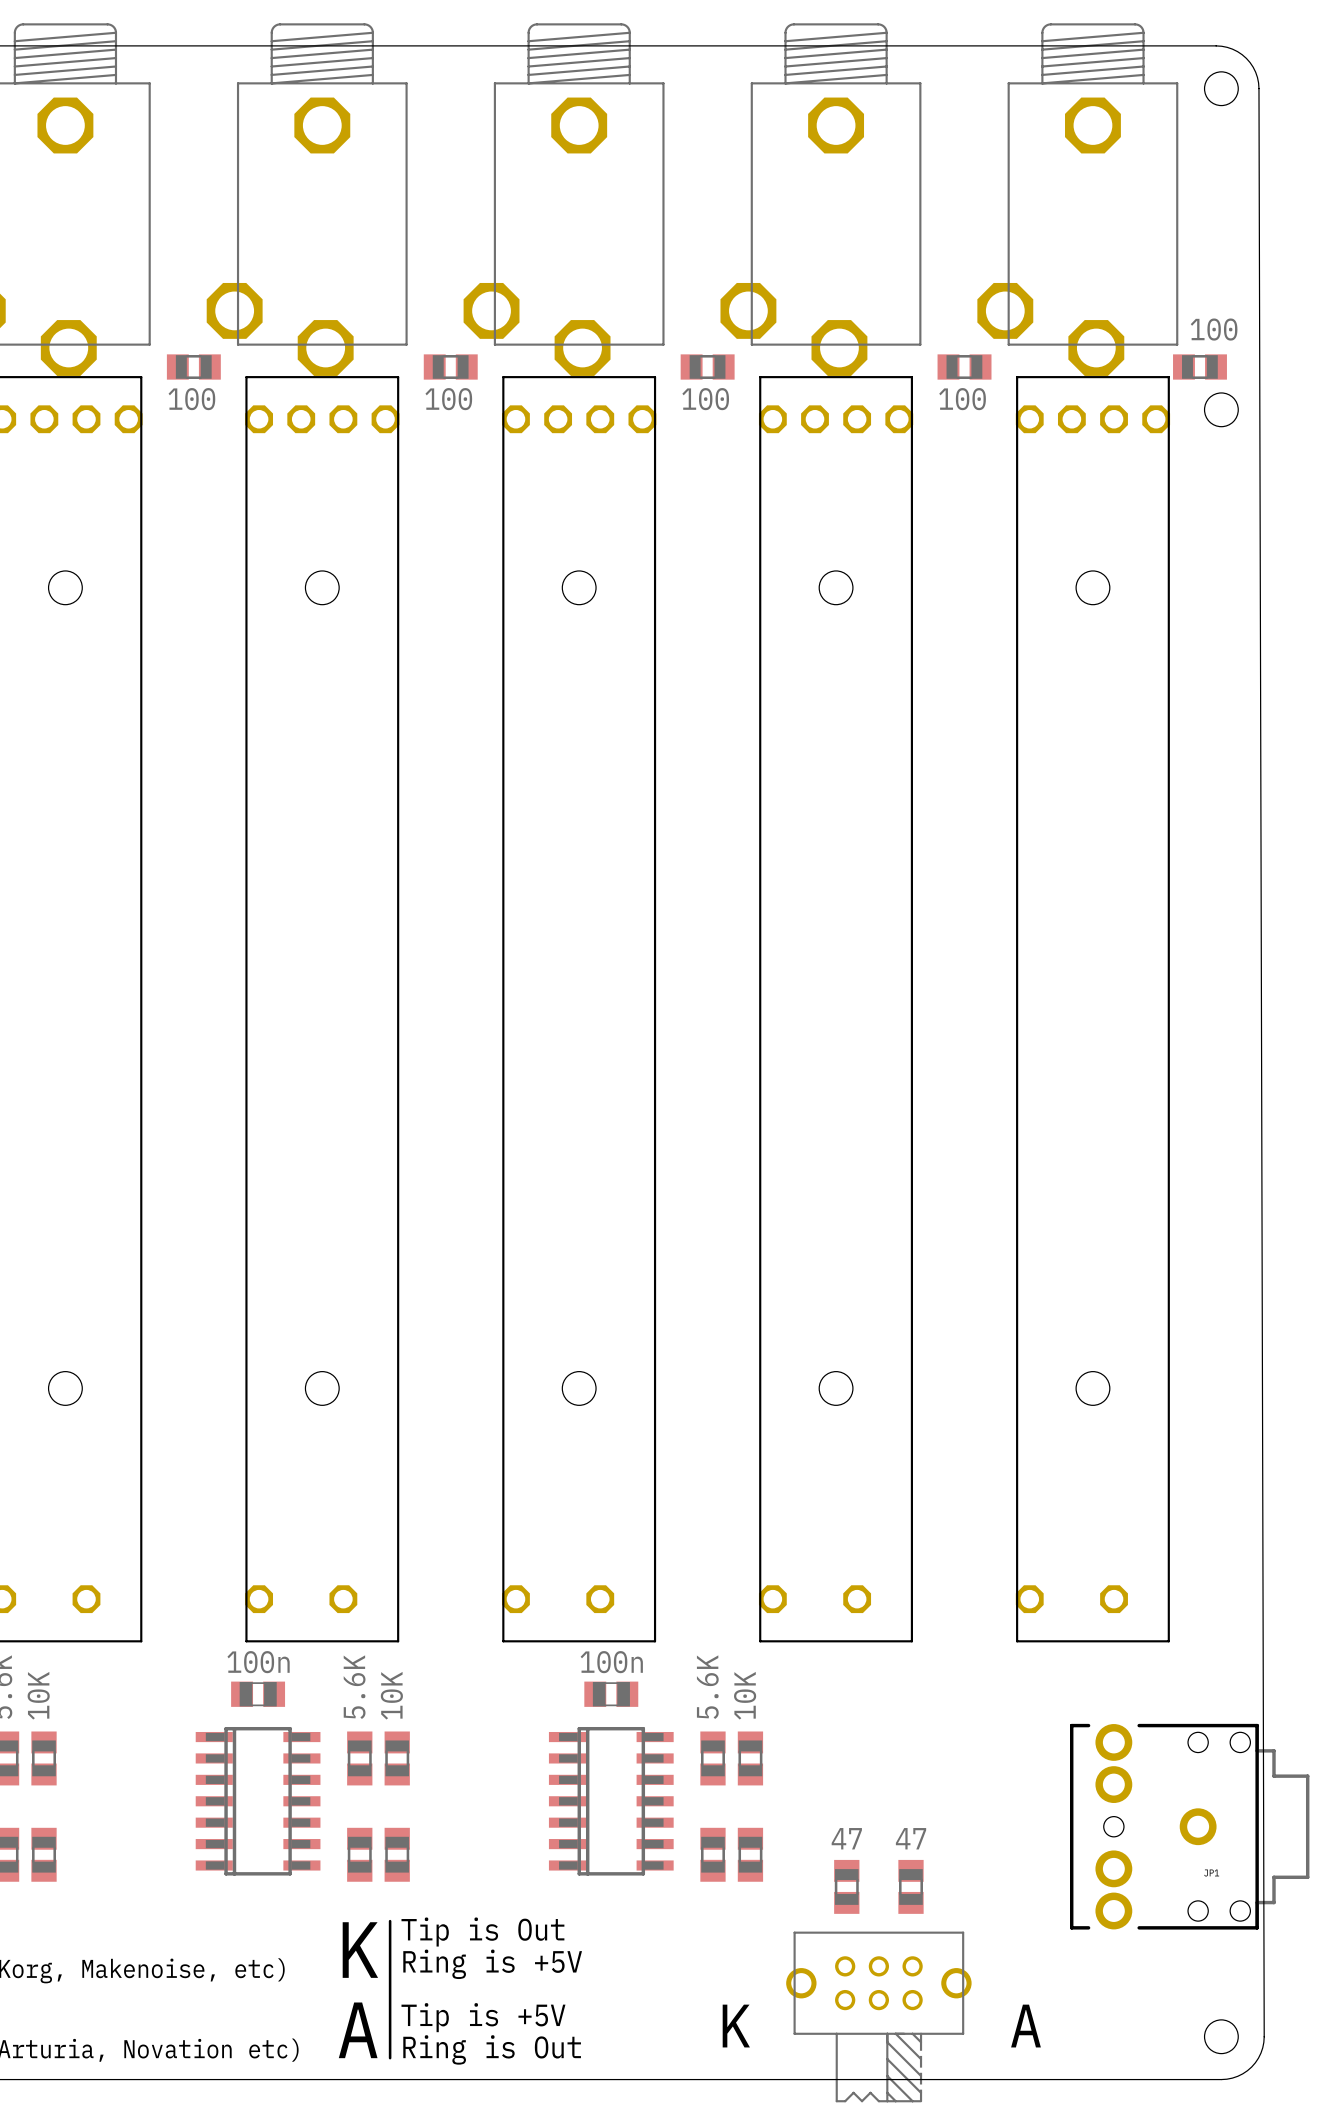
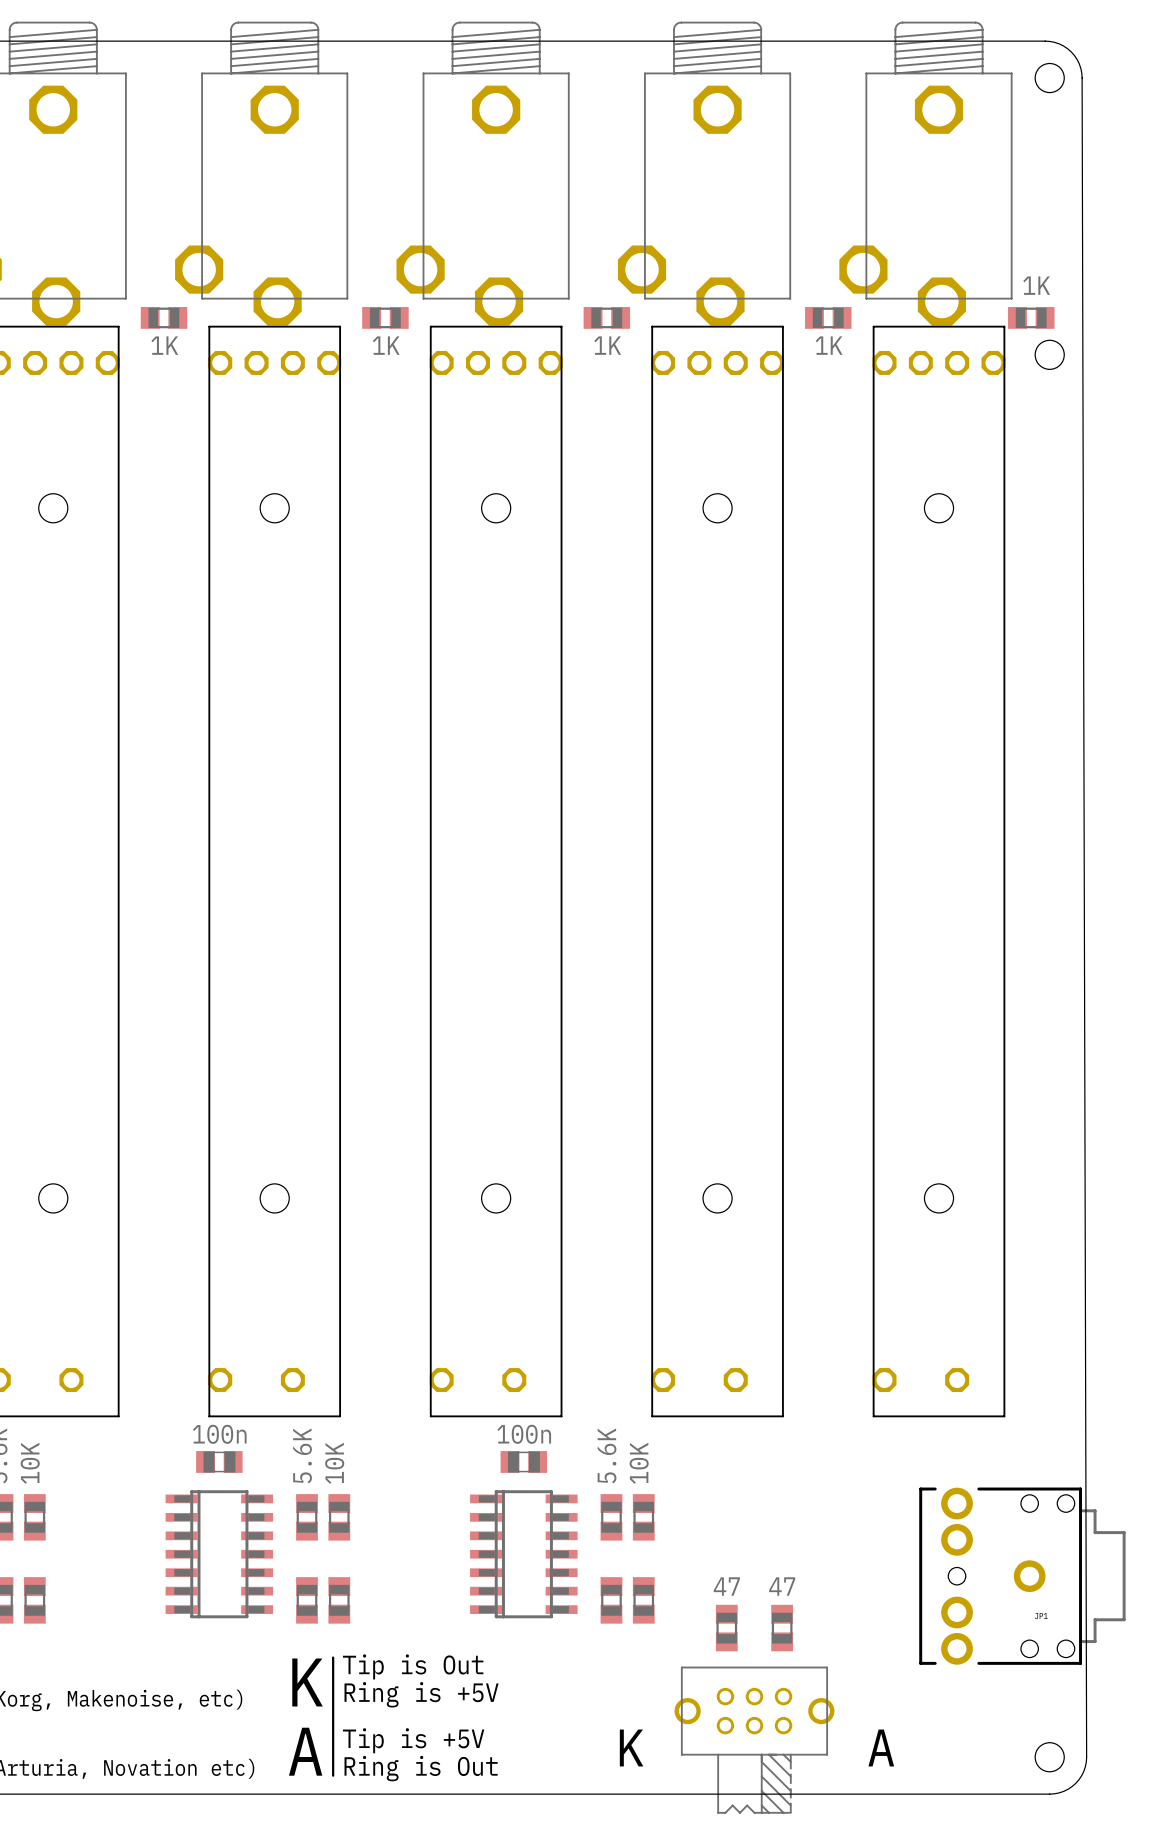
part value: 100 (1214, 329) -> 1K (1036, 285)
part value: 100 (191, 399) -> 1K (164, 345)
part value: 100 (448, 399) -> 1K (386, 345)
part value: 100 (705, 399) -> 1K (607, 345)
part value: 100 (962, 399) -> 1K (829, 345)

